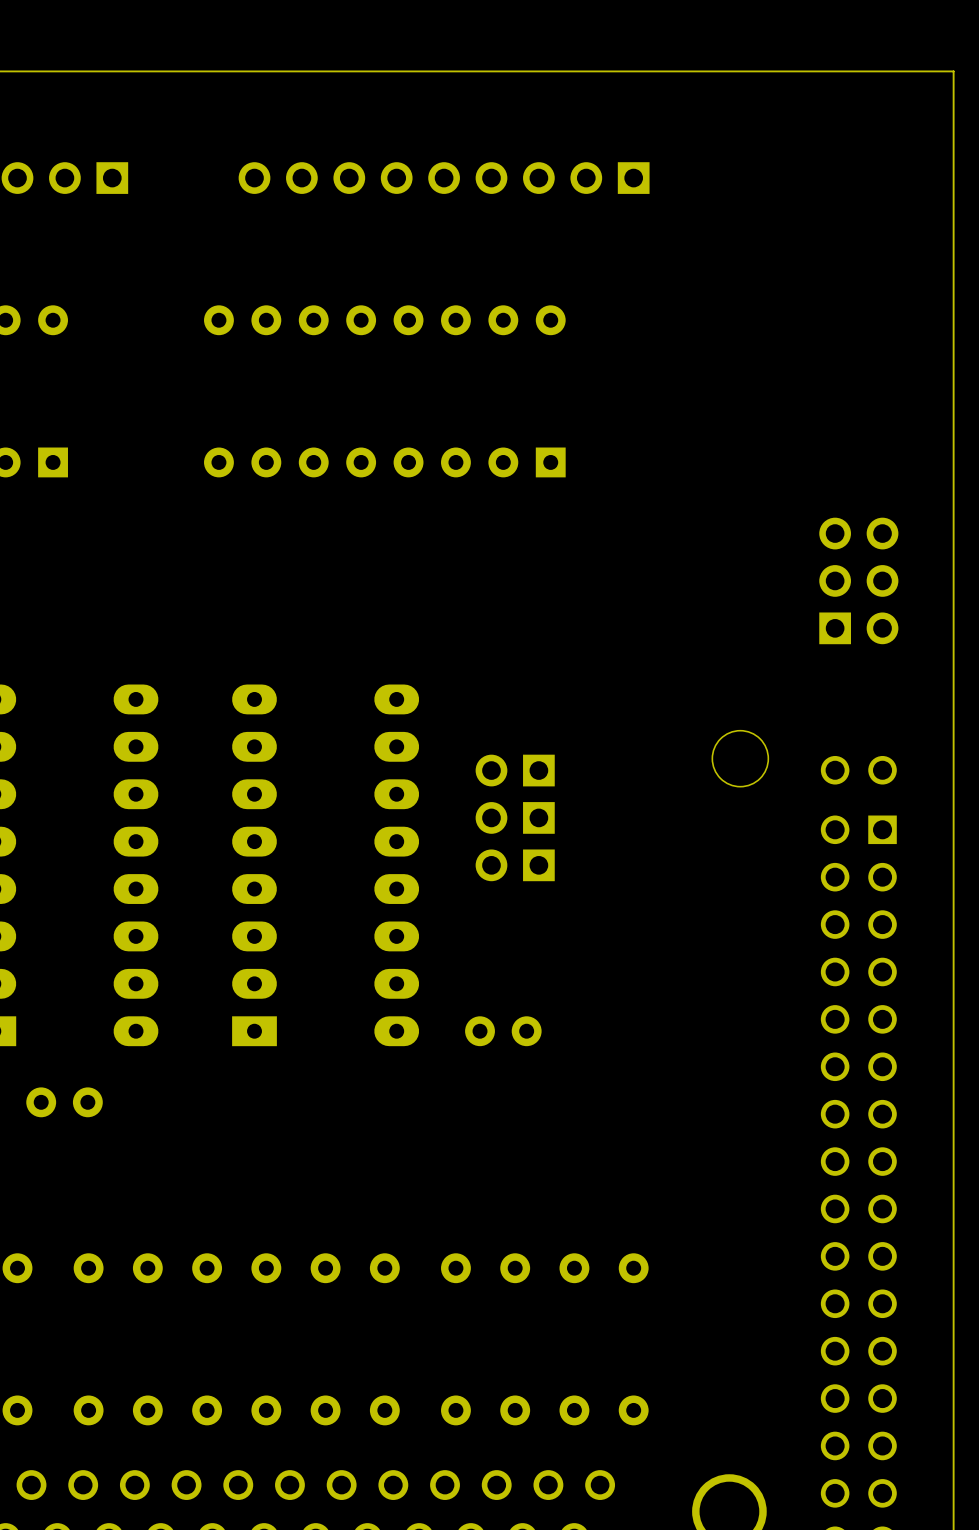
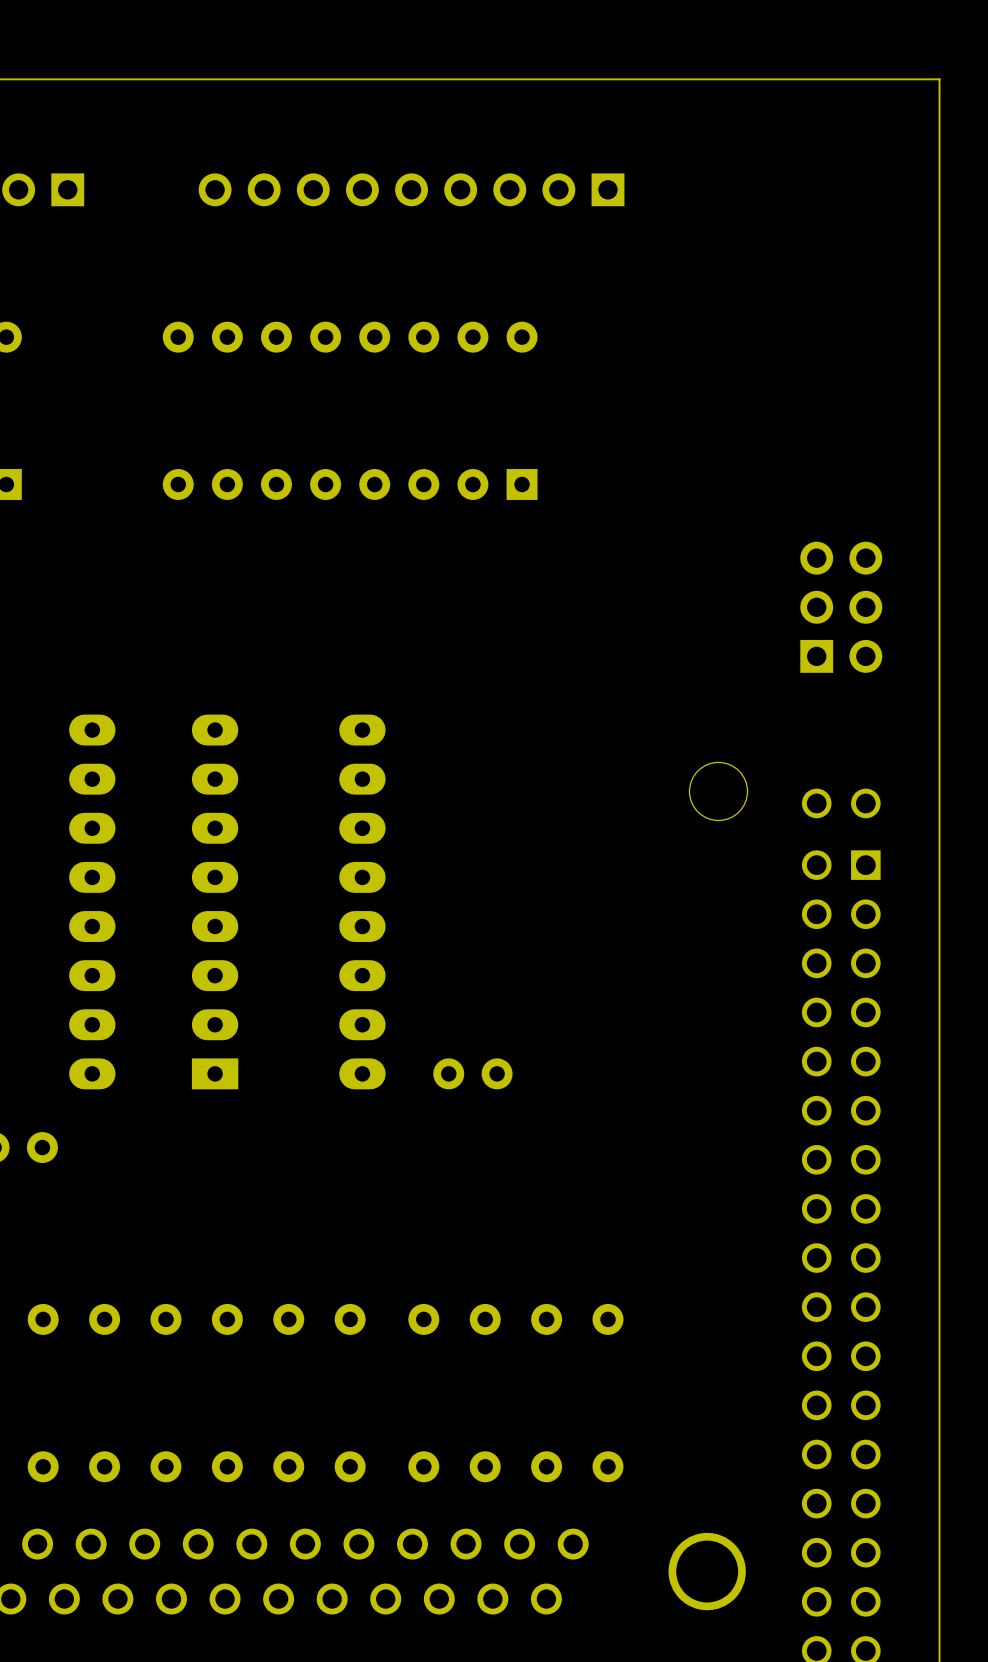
part: (515, 770) -> none
part: (515, 817) -> none
part: (515, 865) -> none

